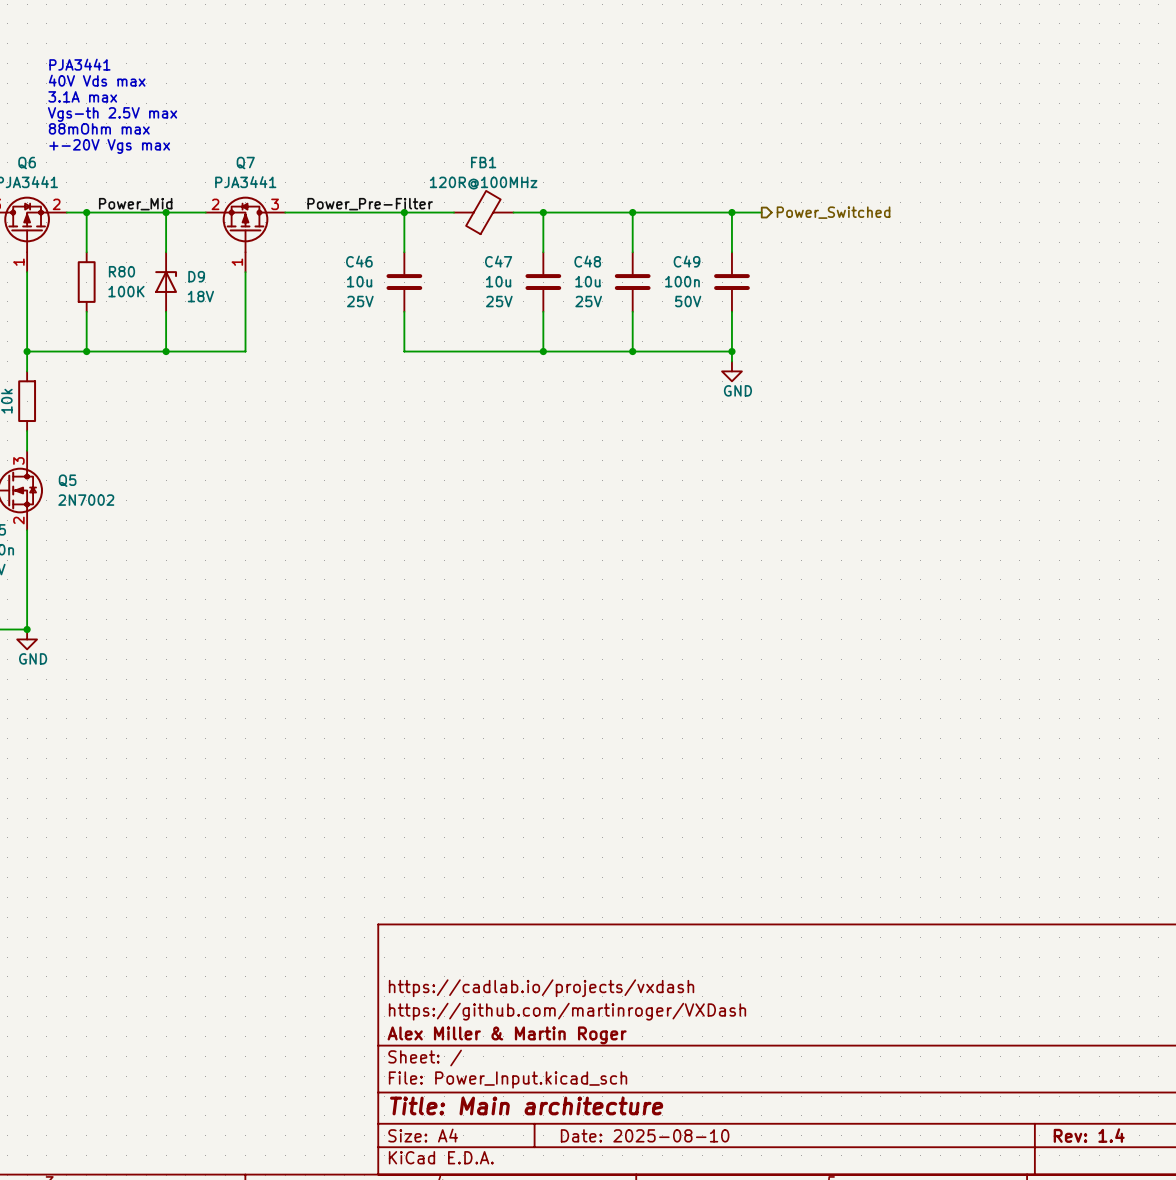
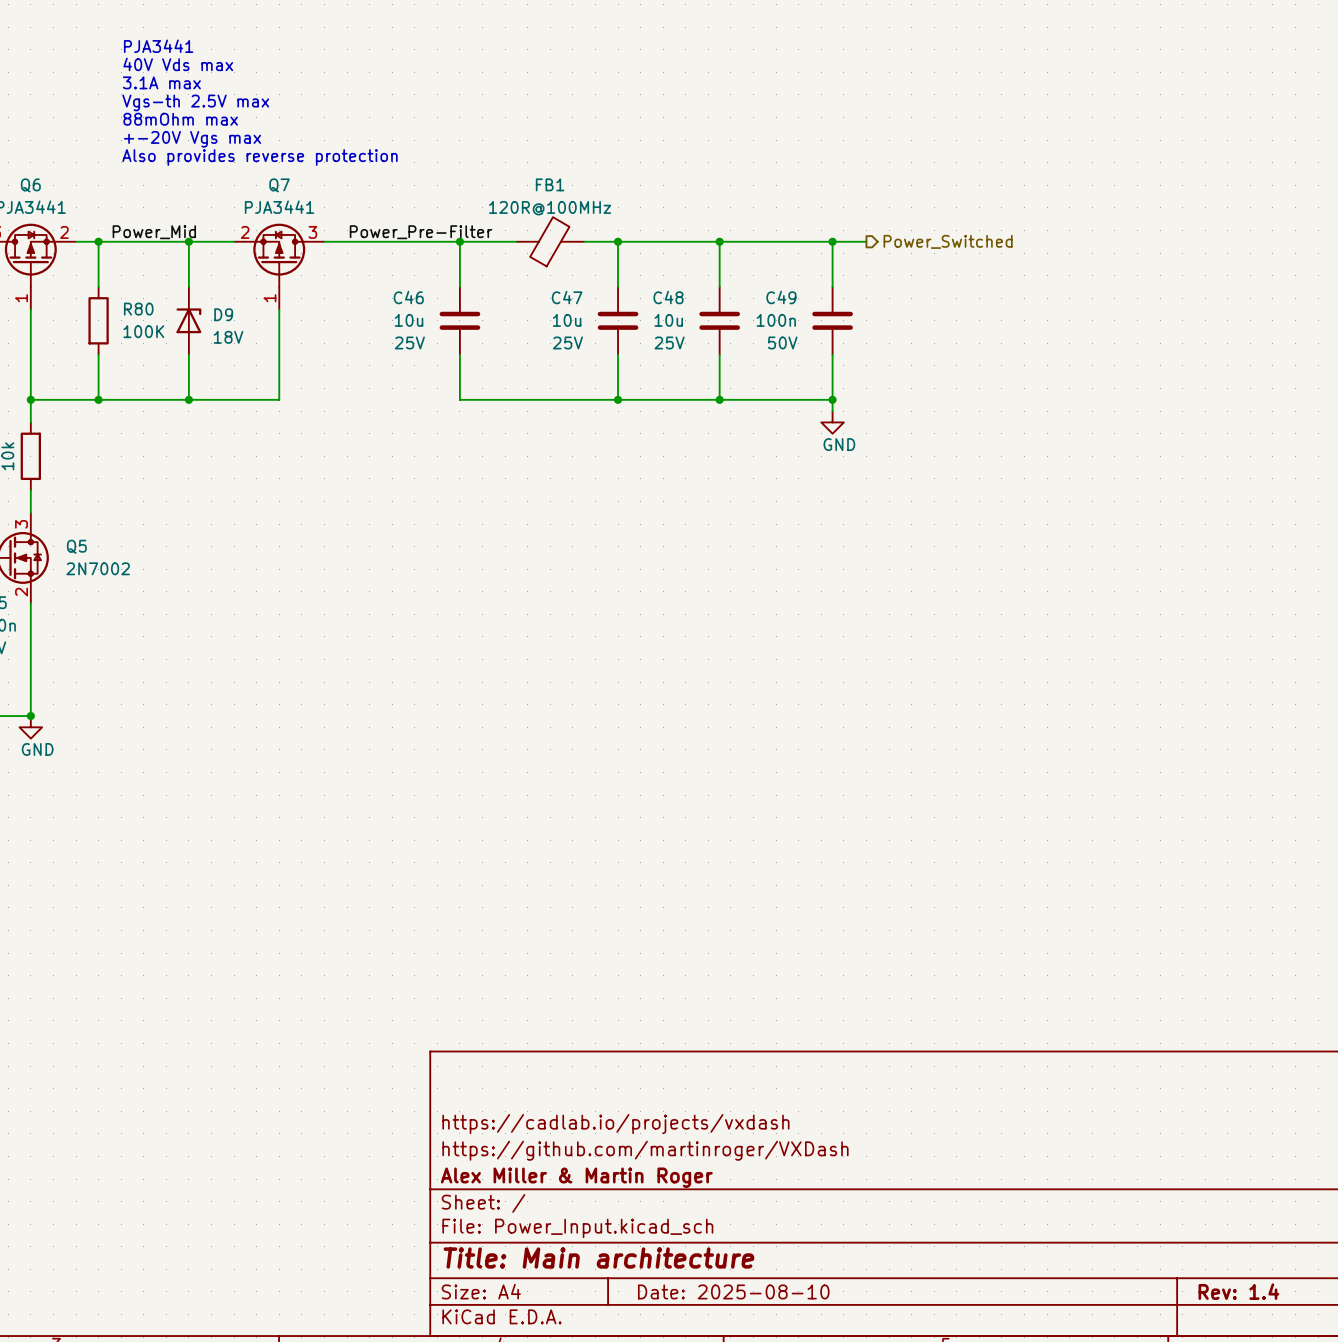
text position: PJA3441 (79, 64) -> PJA3441 (158, 46)
text position: 40V Vds max (97, 80) -> 40V Vds max (178, 64)
text position: 3.1A max (82, 96) -> 3.1A max (161, 82)
text position: Vgs-th 2.5V max (112, 114) -> Vgs-th 2.5V max (195, 102)
text position: 88mOhm max (99, 128) -> 88mOhm max (180, 119)
text: none -> Also provides reverse protection (259, 157)
text position: +-20V Vgs max (109, 146) -> +-20V Vgs max (192, 139)

